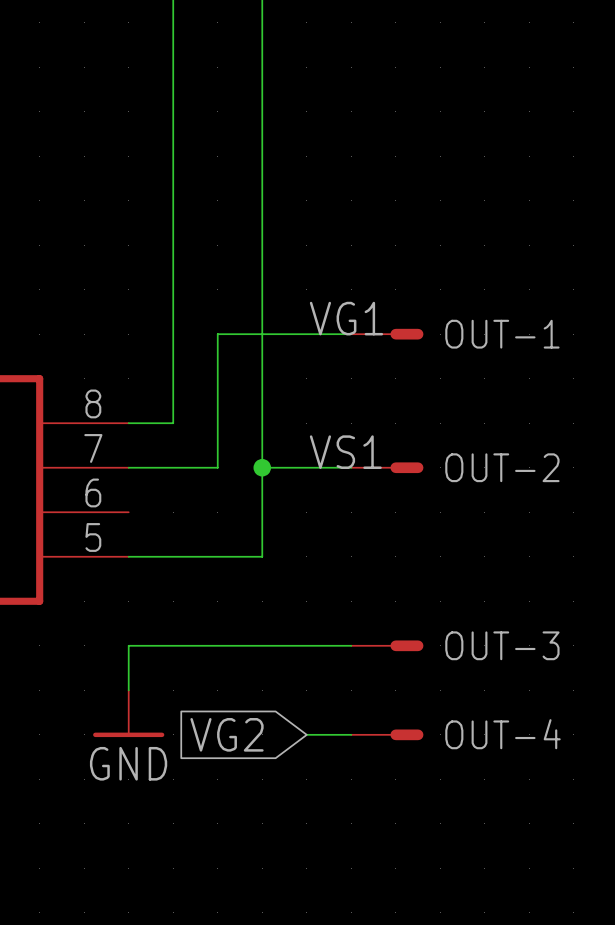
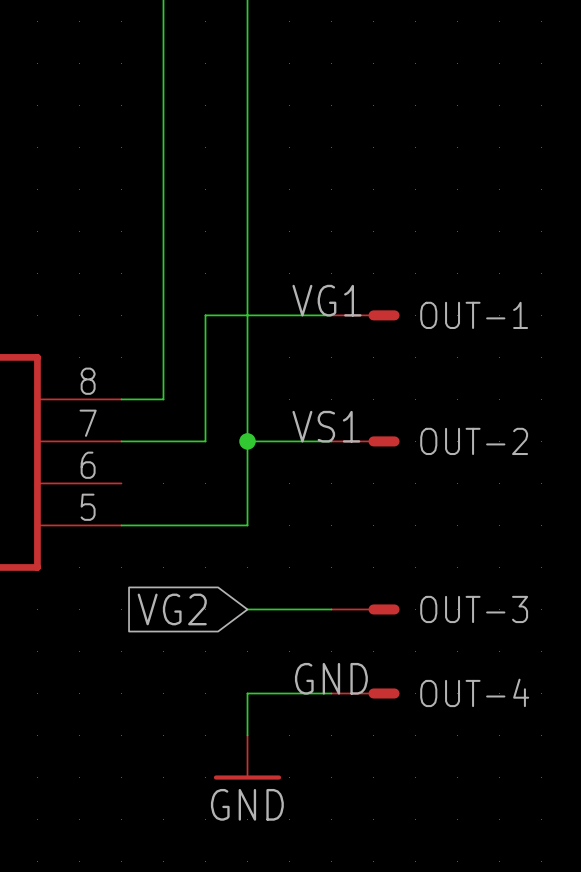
wire: (262, 645) (128, 645) (128, 690) -> none
power symbol position: GND (128, 713) -> GND (247, 757)
label: none -> GND (331, 678)
global label position: VG2 (227, 734) -> VG2 (172, 609)
wire: none -> (289, 693) (247, 693) (247, 735)

